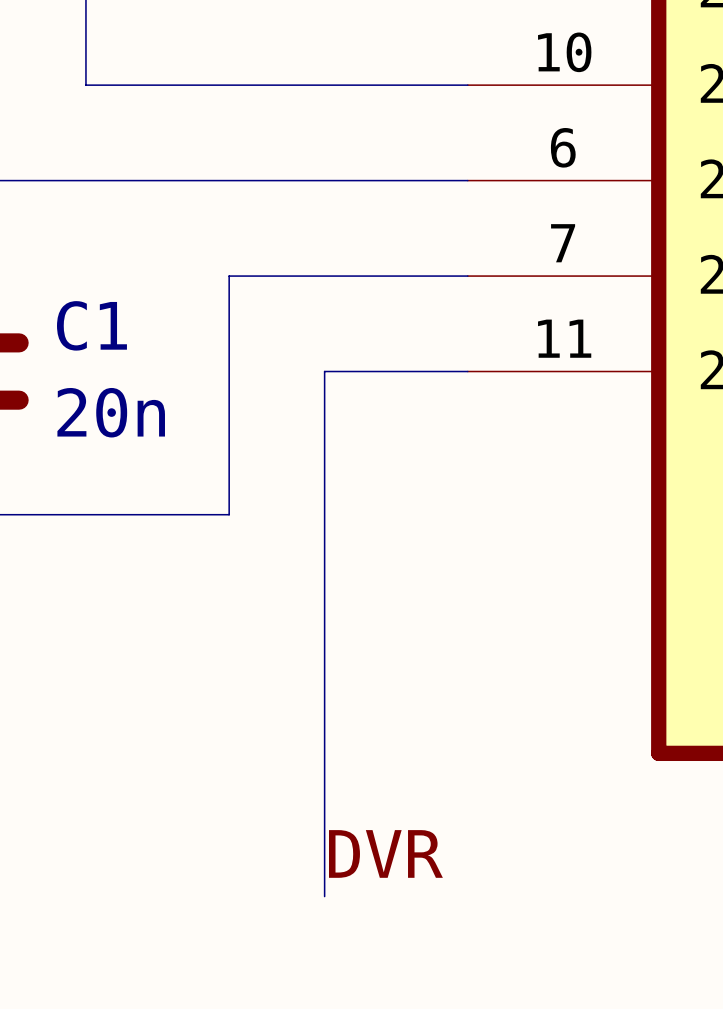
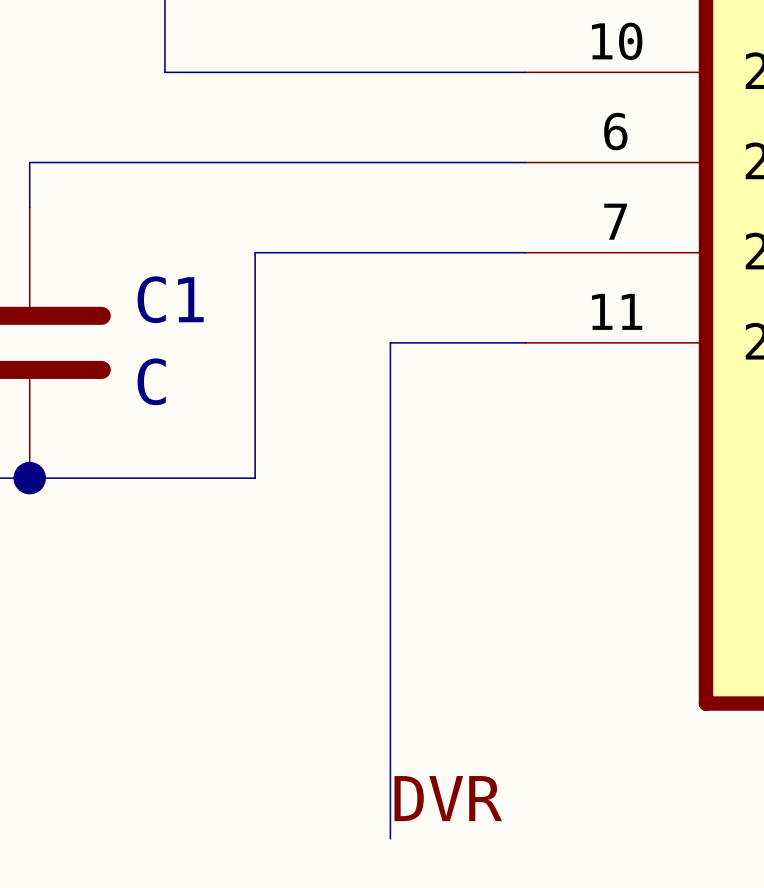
wire: (229, 276) (229, 514) (181, 514) -> (300, 252) (255, 252) (255, 478)
C1 value: 20n (111, 412) -> C (151, 381)

